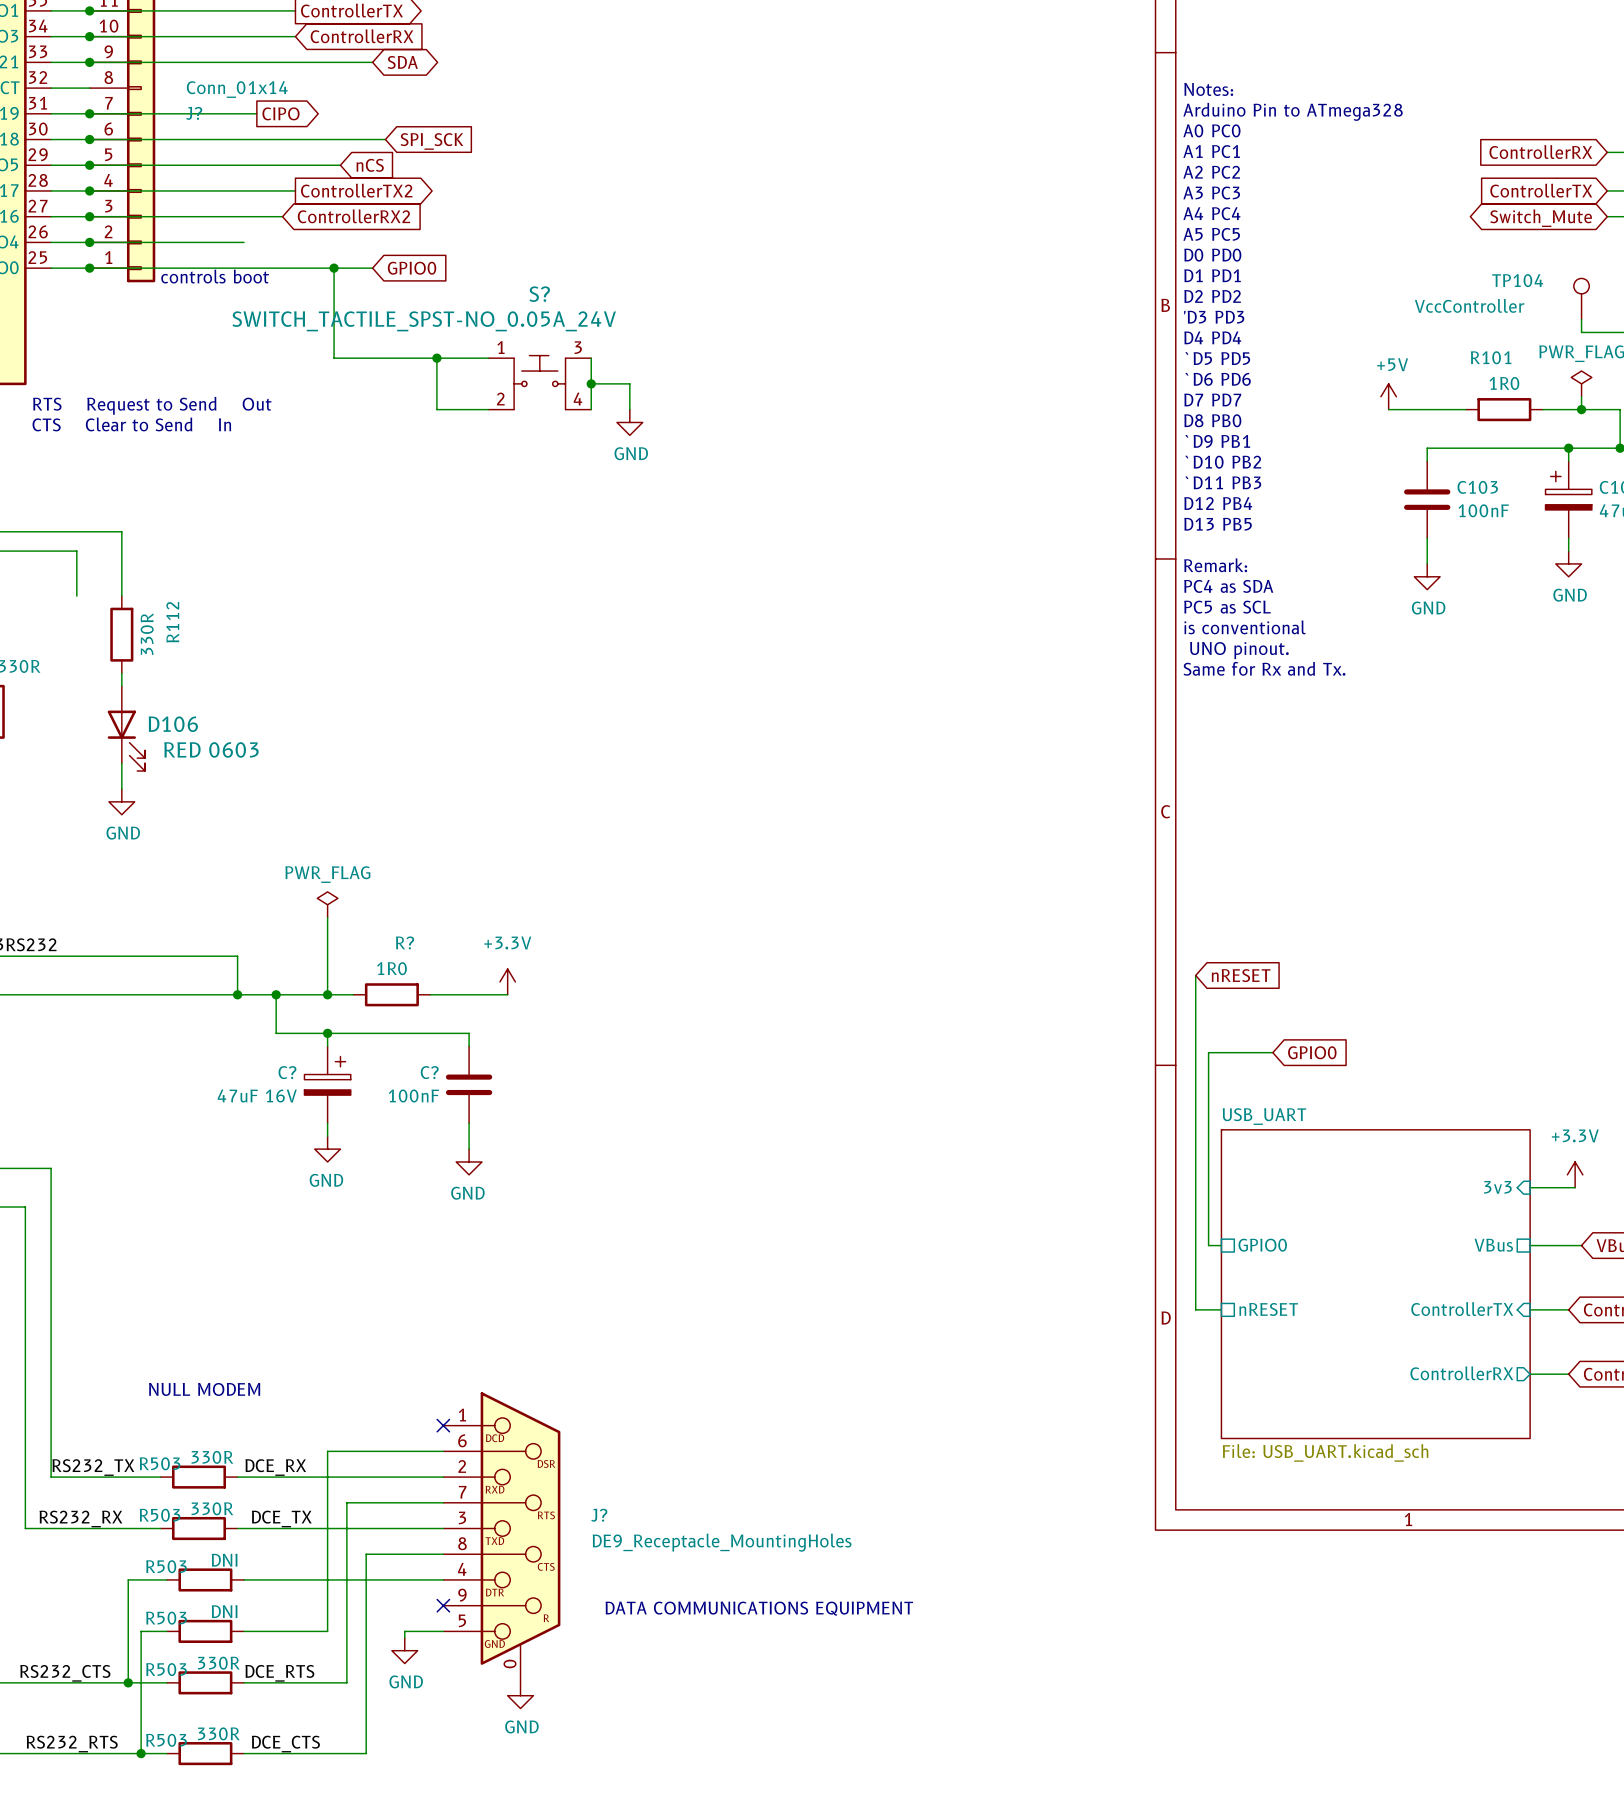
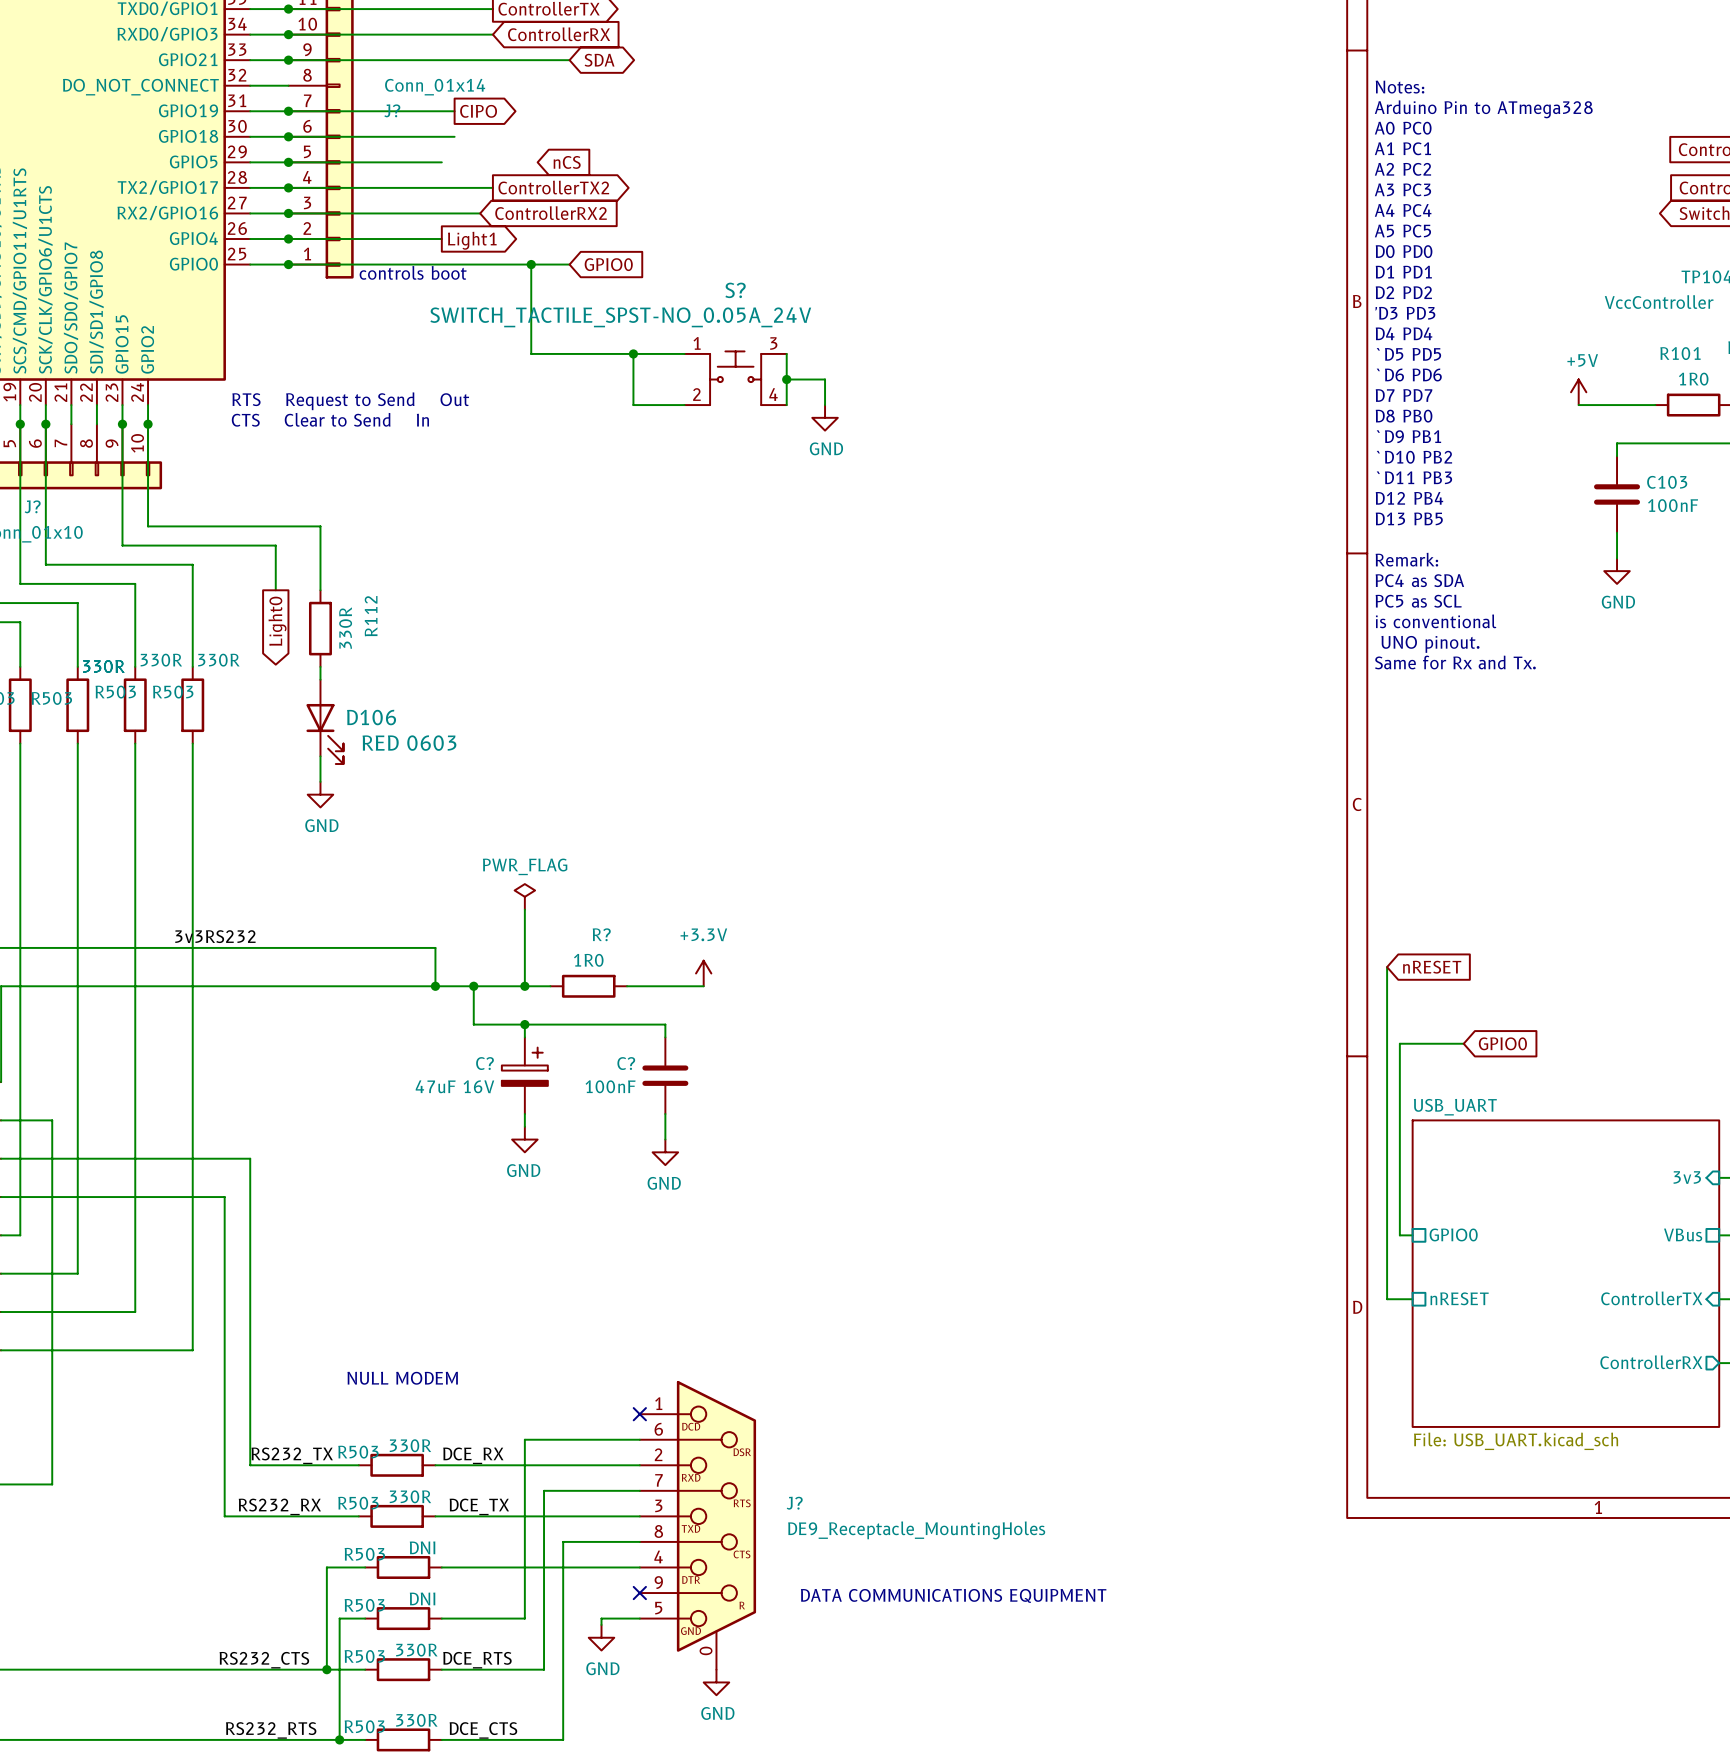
wire: (256, 139) (385, 139) -> none
global label: SPI_SCK (431, 141) -> none
wire: (244, 165) (340, 165) -> none
global label: none -> Light1 (472, 240)
global label: none -> Light0 (277, 621)

